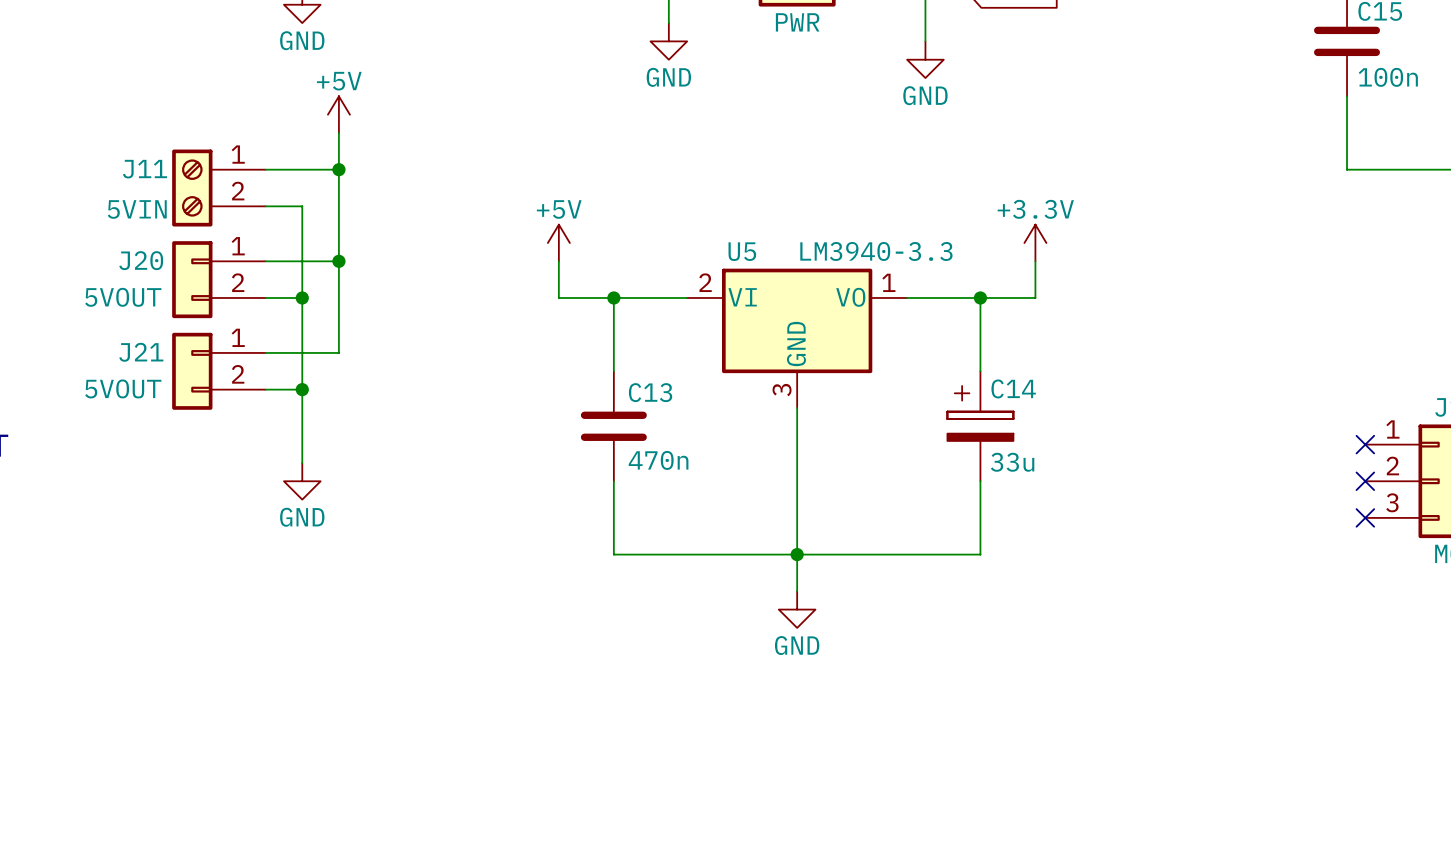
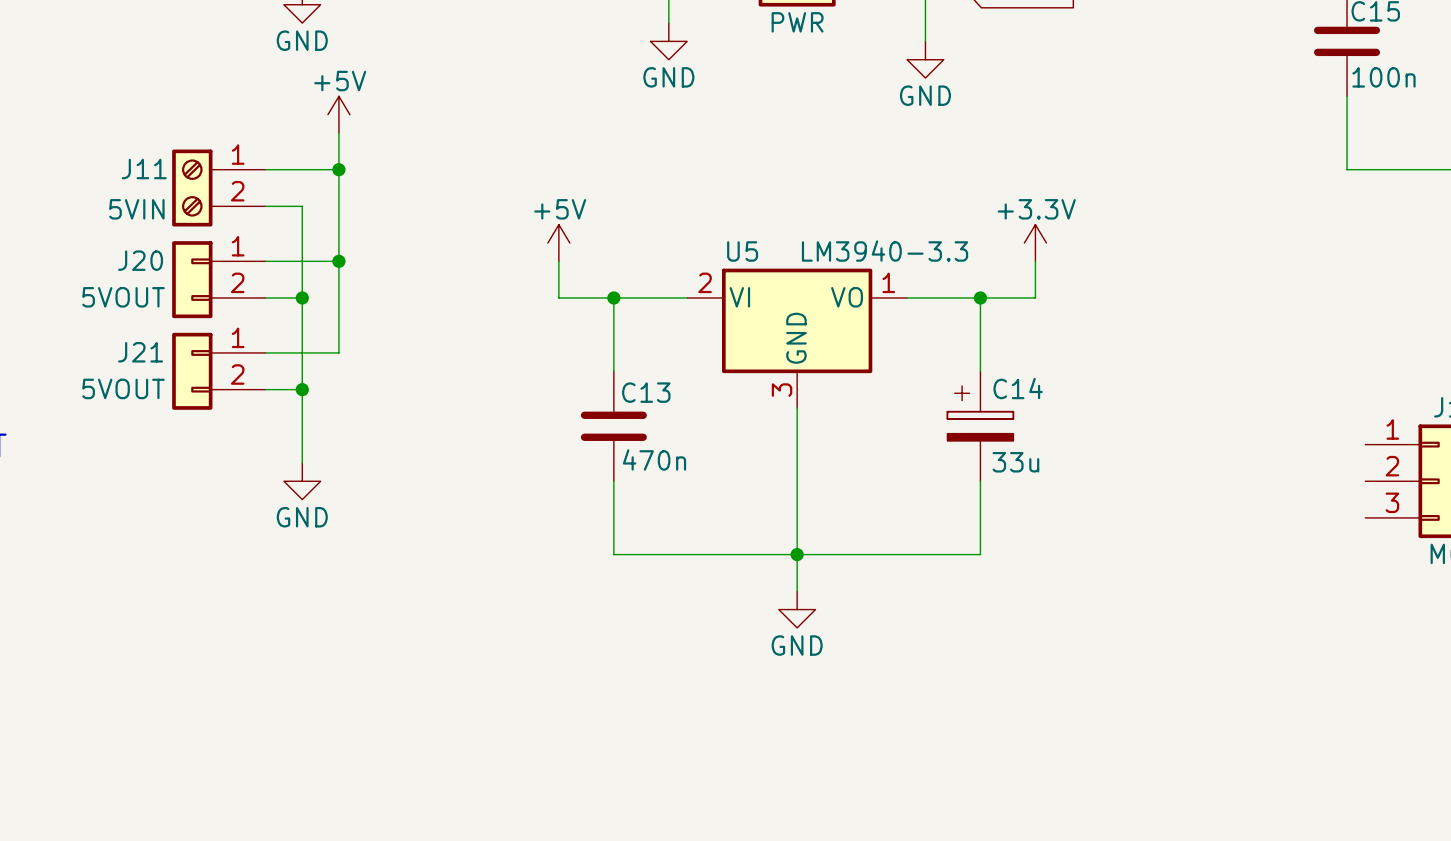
no-connect mark: (1365, 444) -> none
no-connect mark: (1365, 481) -> none
no-connect mark: (1365, 517) -> none

